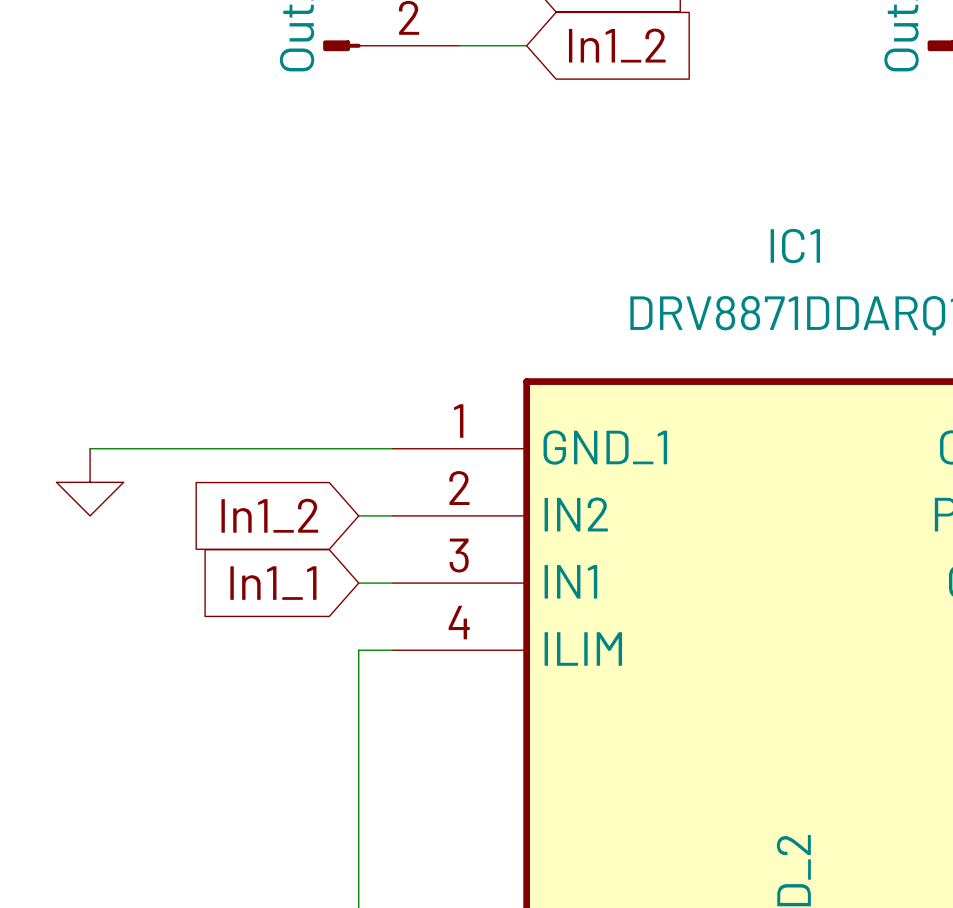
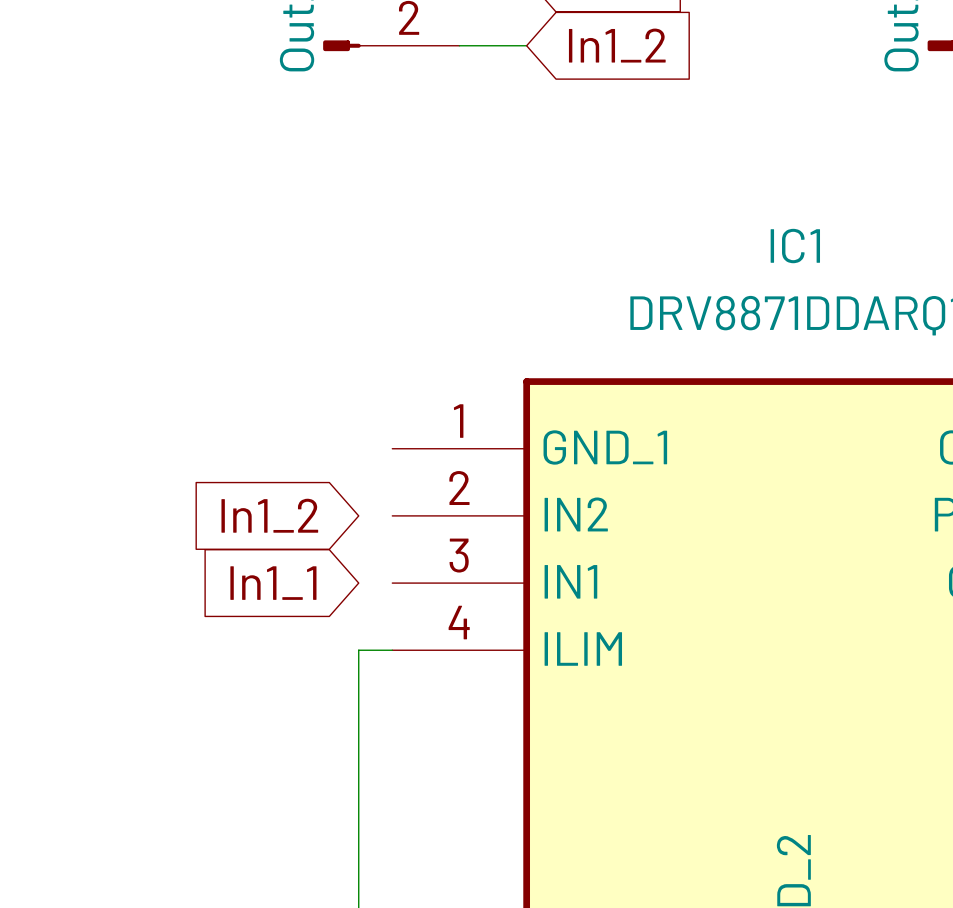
wire: (90, 448) (392, 448) -> none
power symbol: (90, 482) -> none
wire: (358, 515) (392, 515) -> none
wire: (358, 583) (392, 583) -> none

